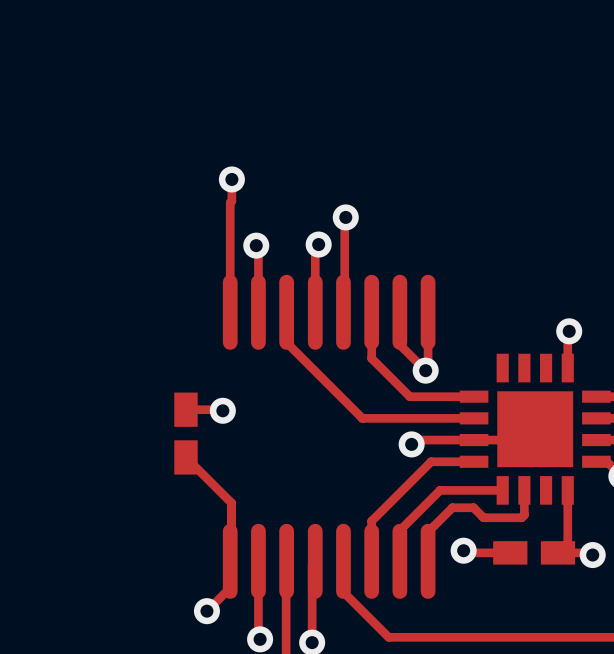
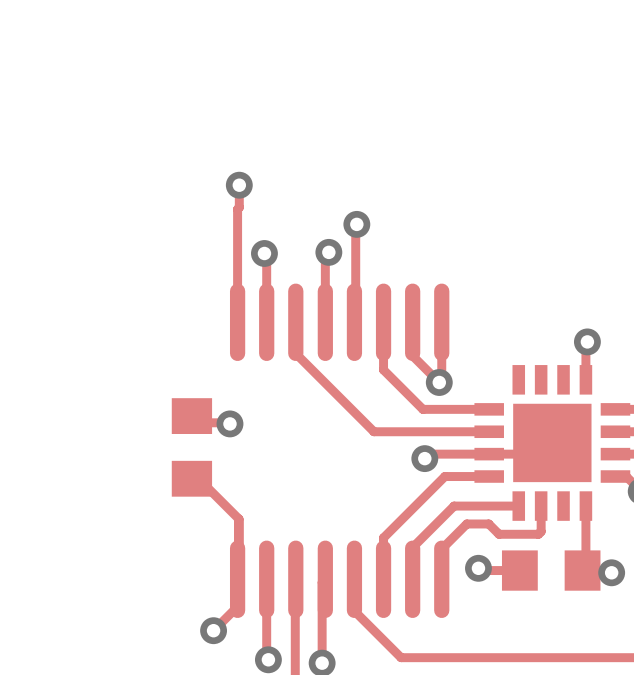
part footprint: [174, 392, 198, 475] -> [171, 398, 213, 497]
part footprint: [493, 541, 576, 565] -> [501, 550, 601, 591]

